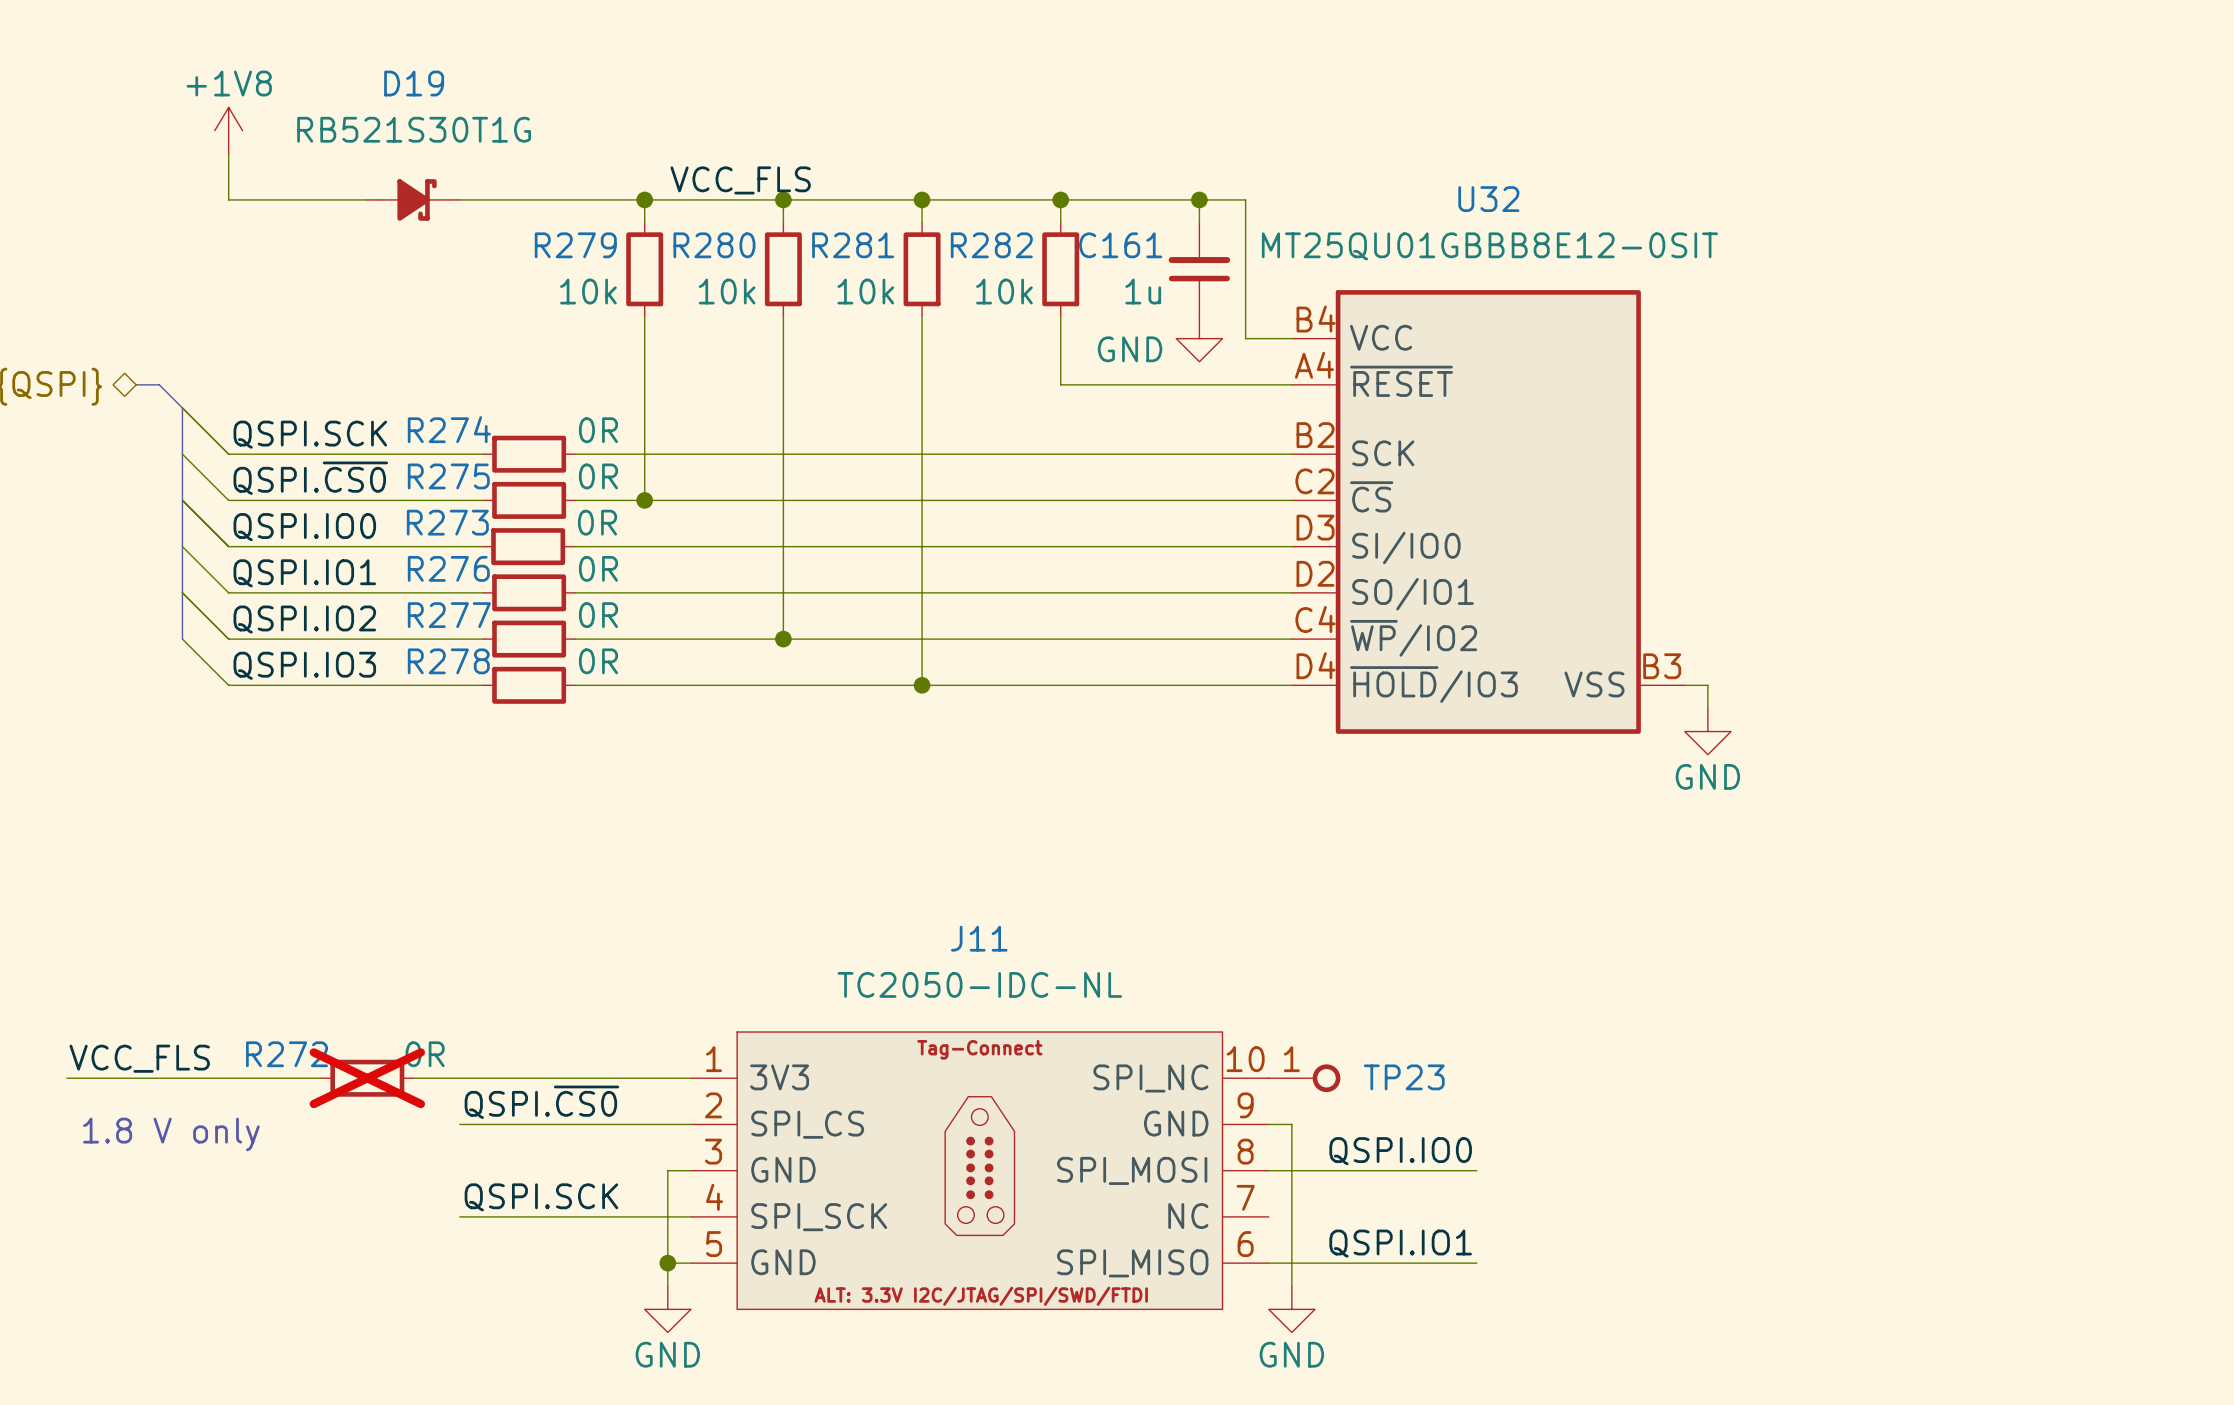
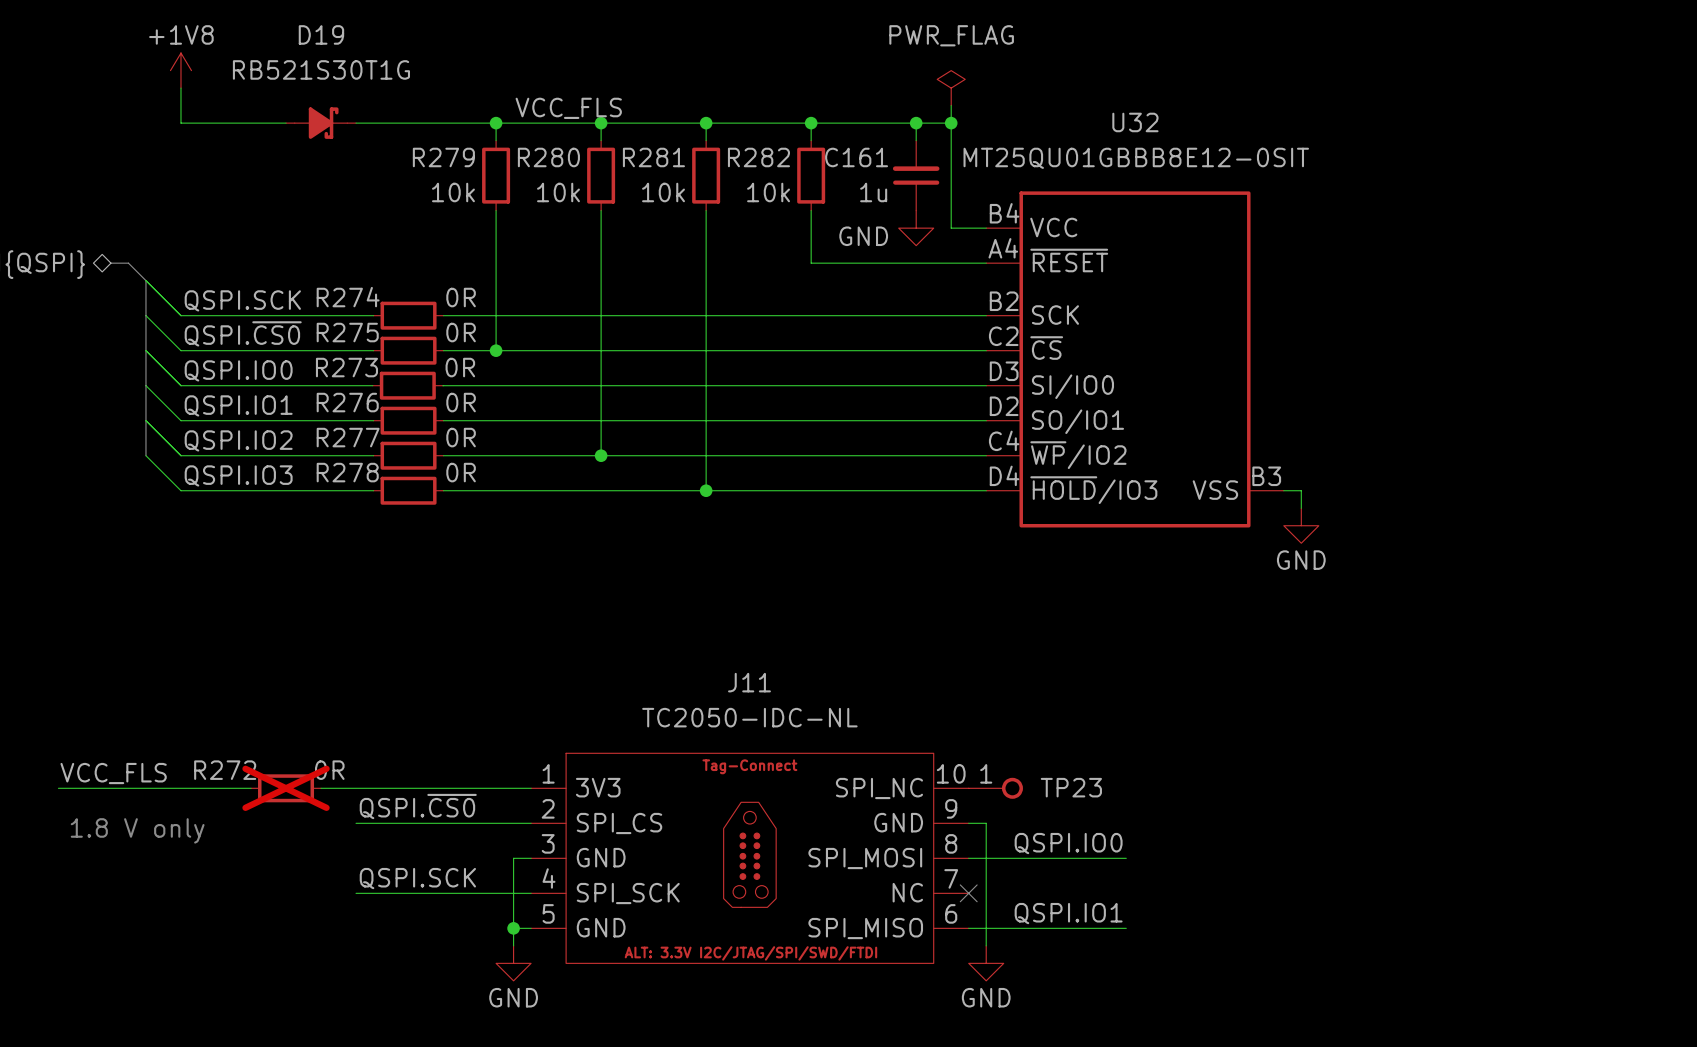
power symbol: none -> PWR_FLAG (951, 88)
wire: none -> (951, 105) (951, 123)
junction: none -> (951, 123)
no-connect mark: none -> (968, 893)

